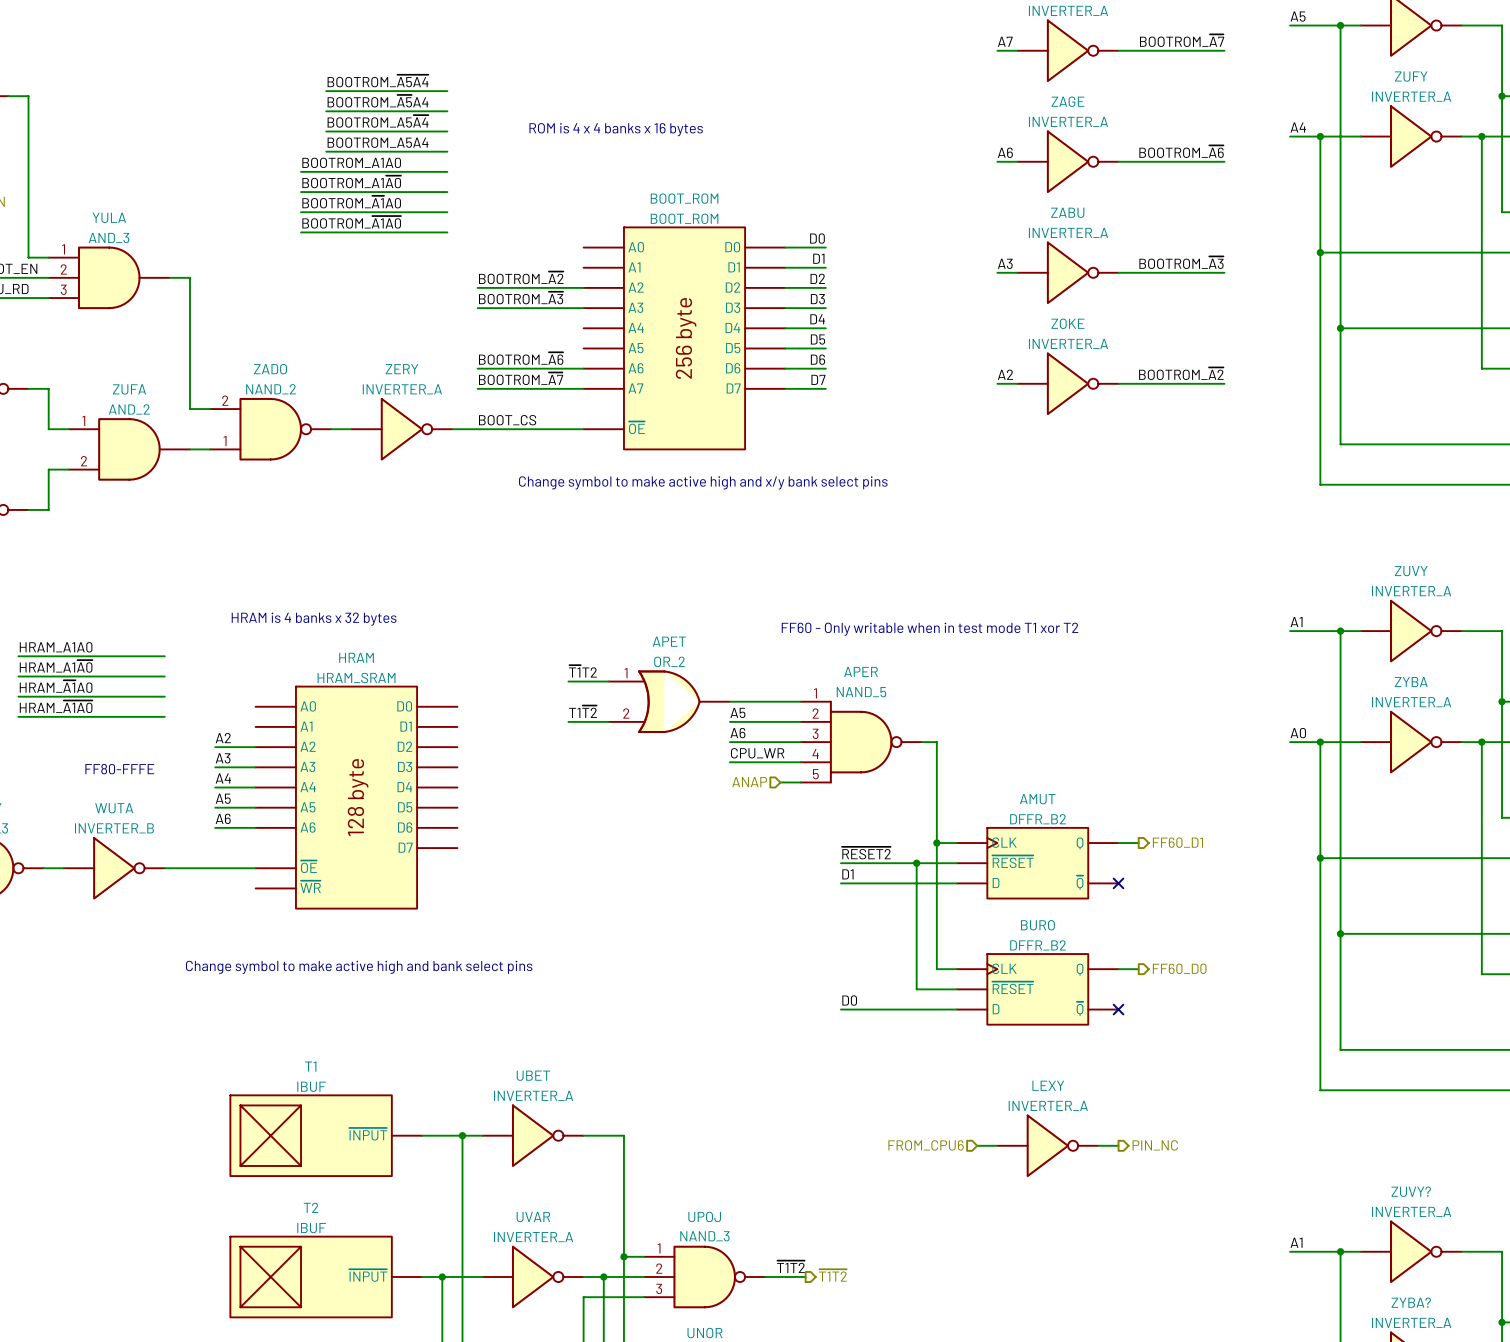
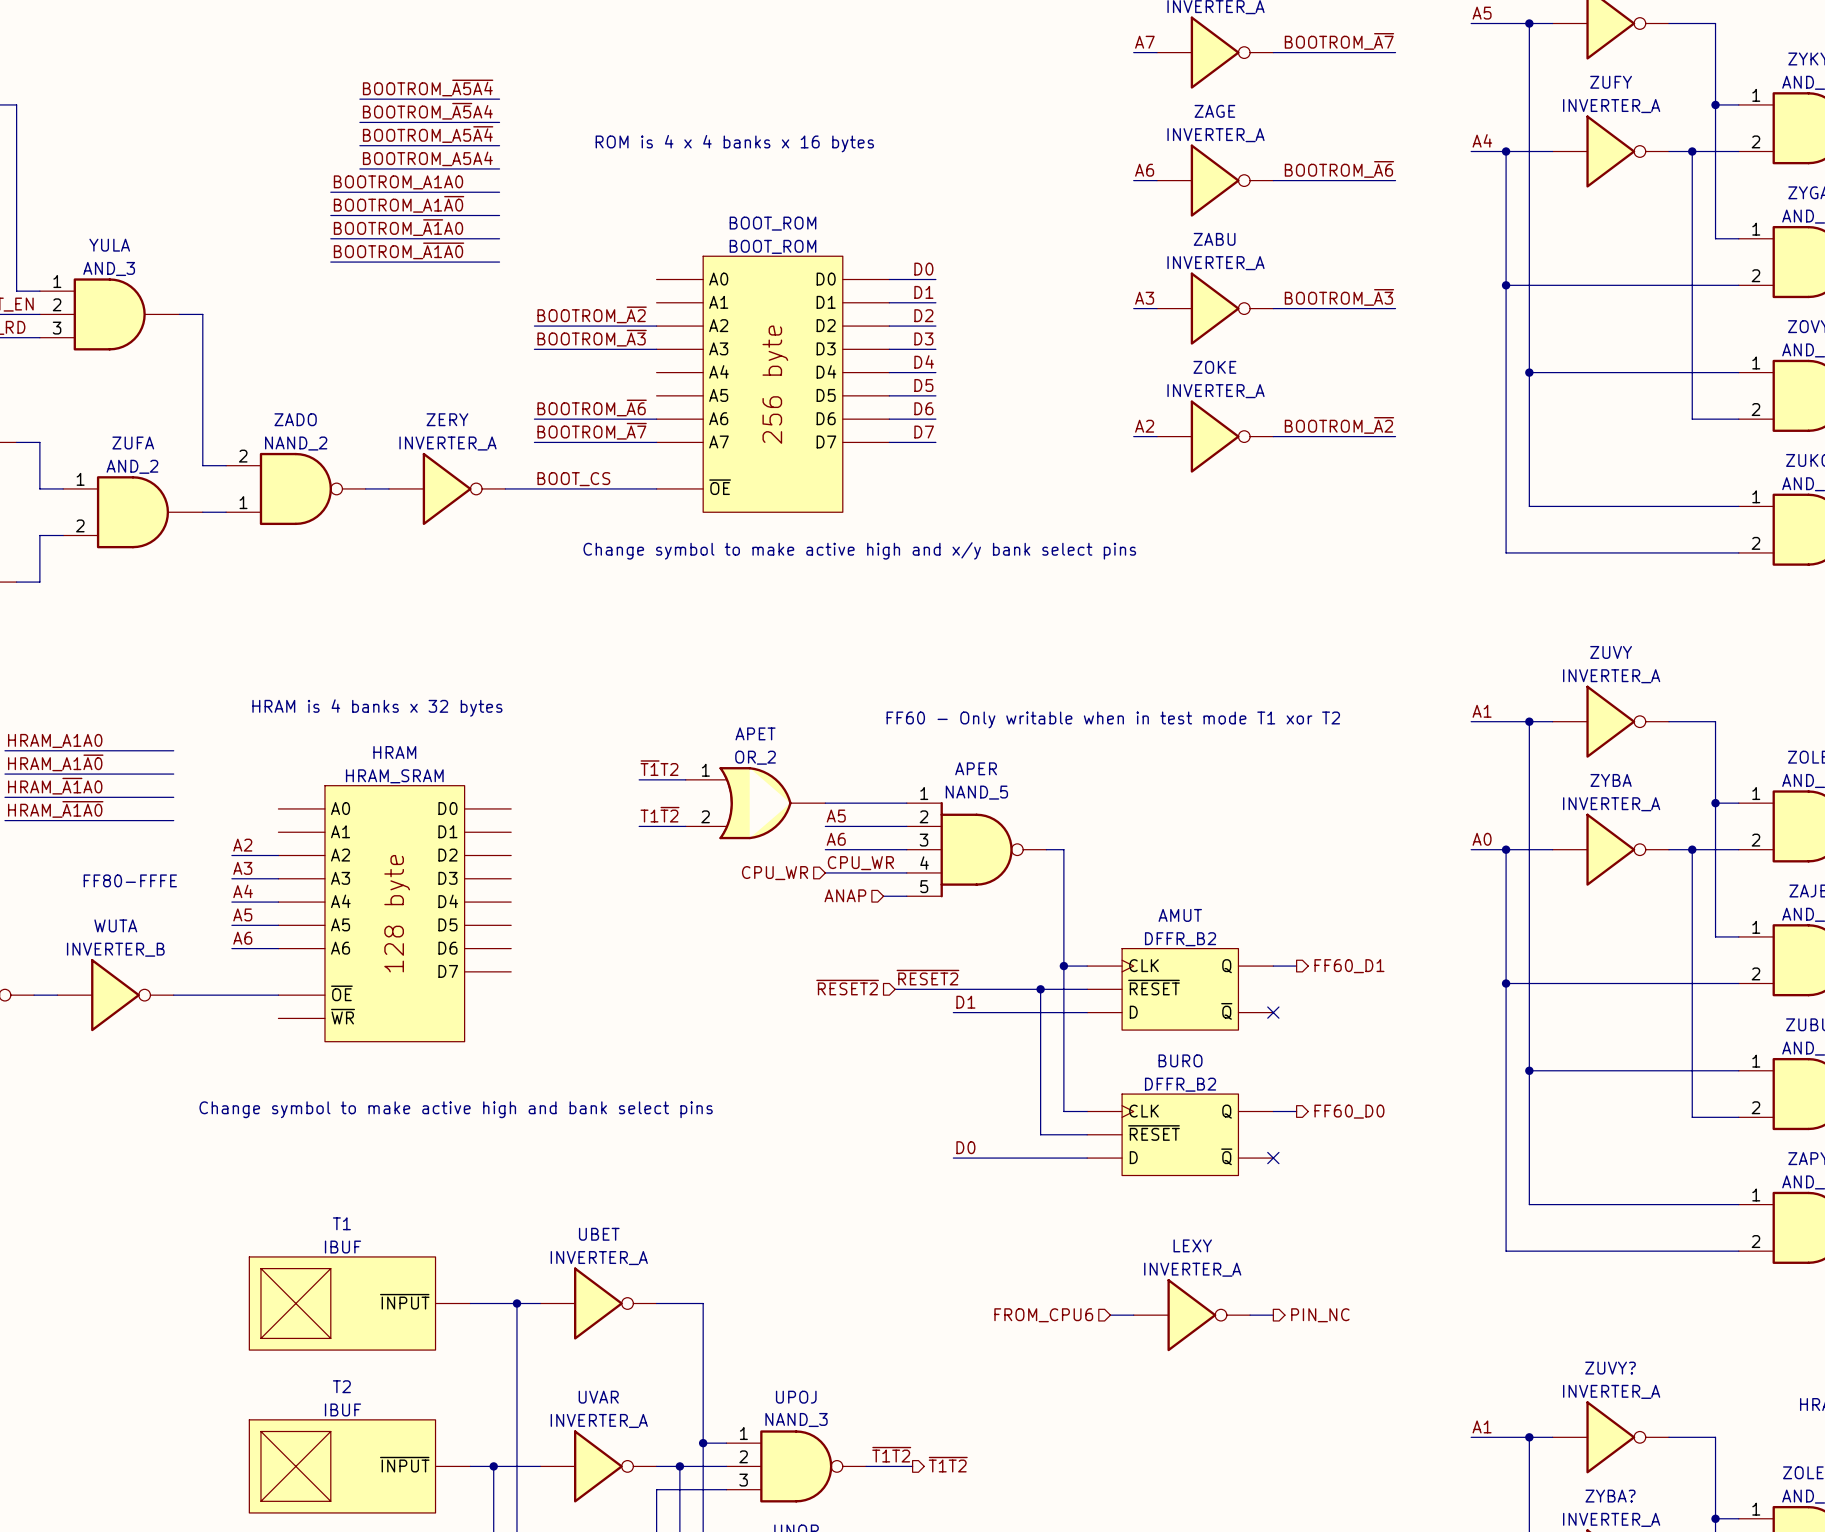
hierarchical label: none -> CPU_WR (775, 873)
label position: ~{RESET2} (866, 853) -> ~{RESET2} (927, 977)
hierarchical label: none -> ~{RESET2} (847, 987)
wire: none -> (895, 989) (953, 989)

